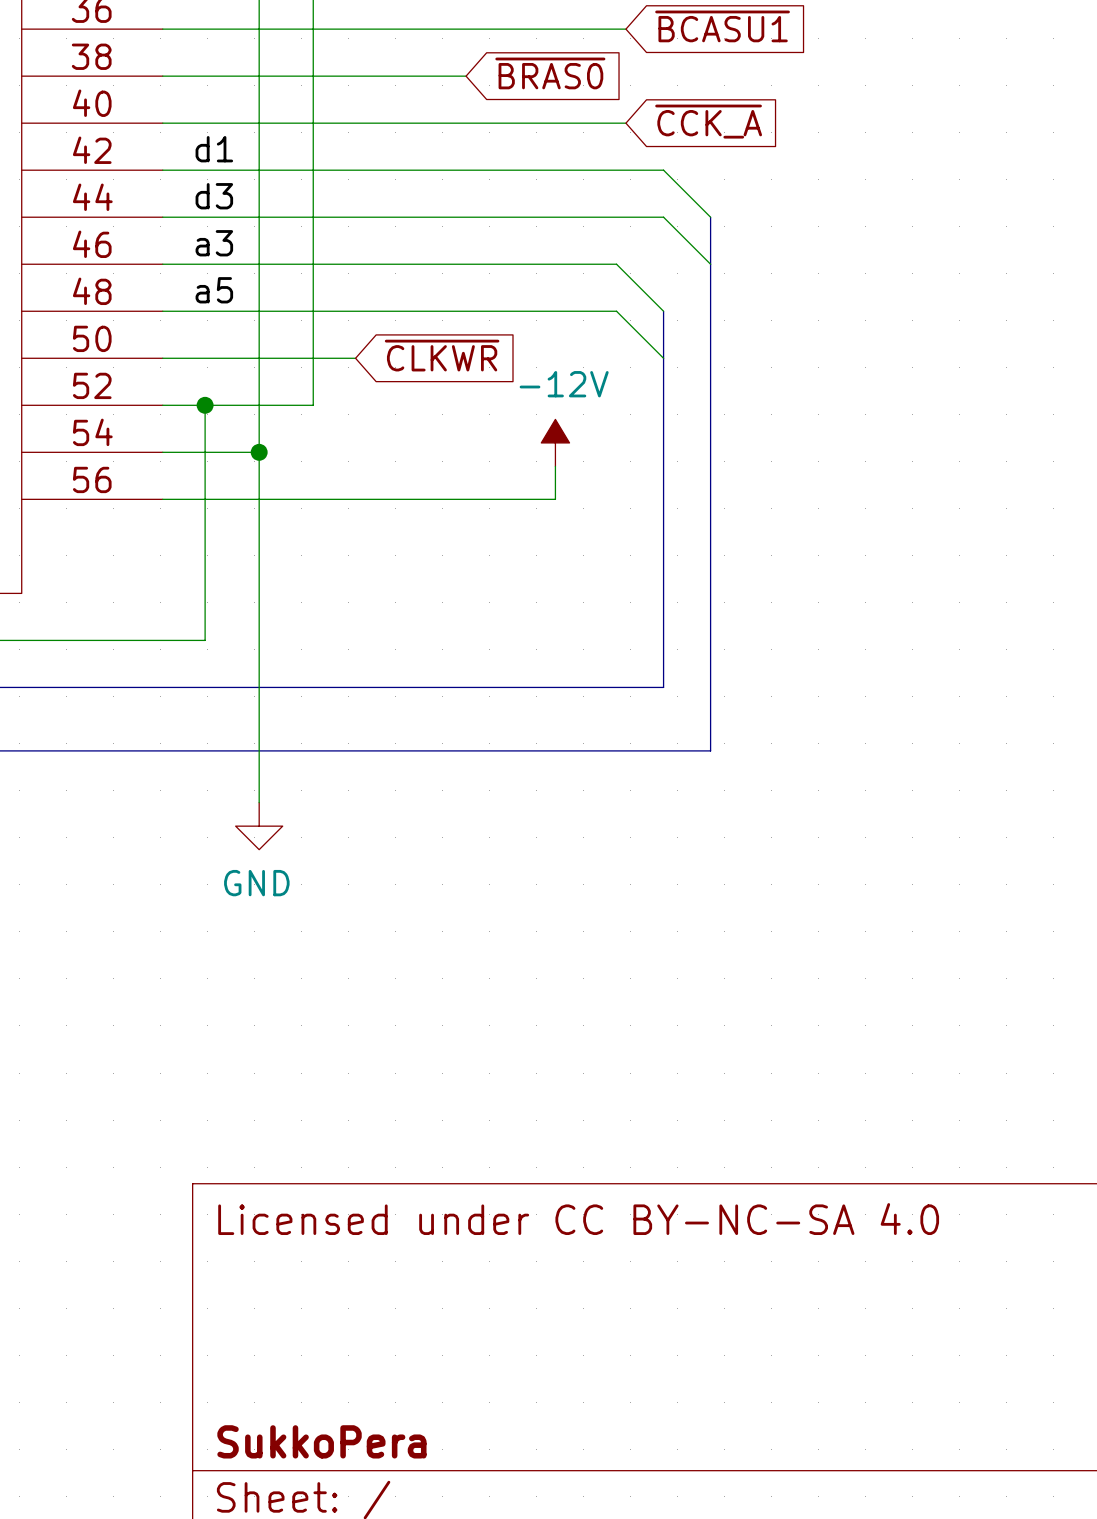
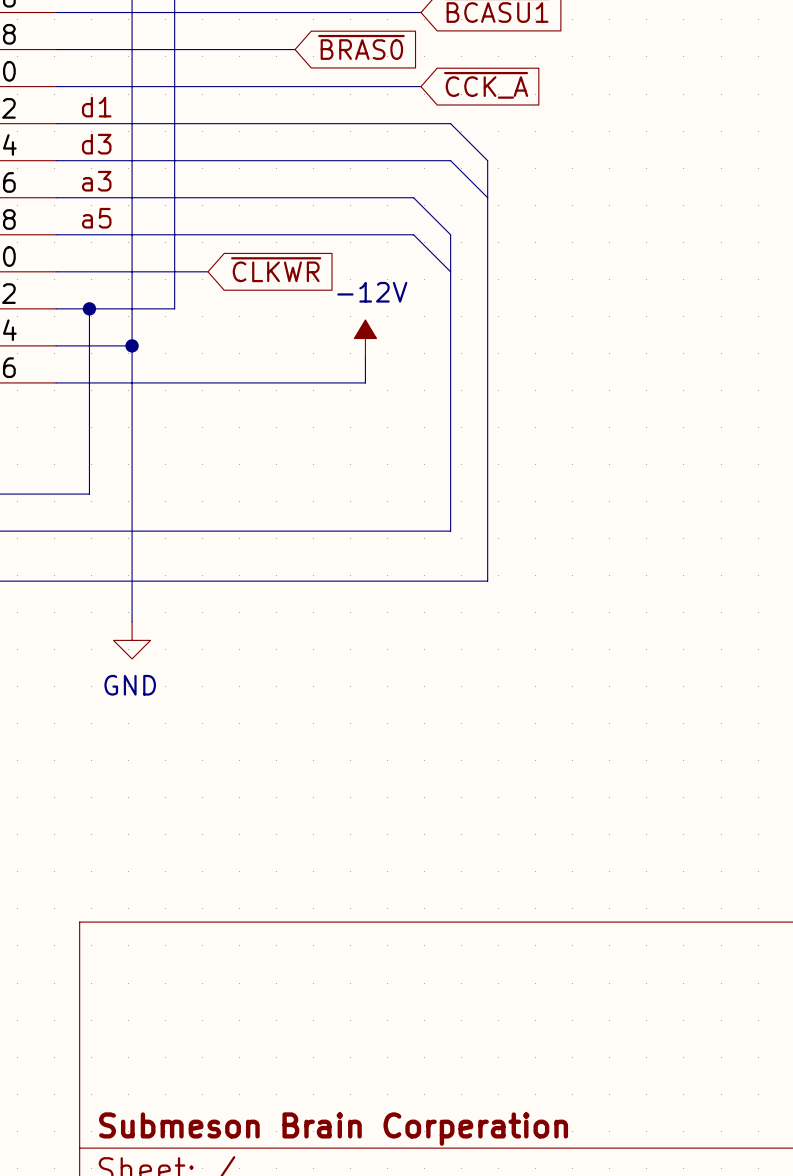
title block: Licensed under CC BY-NC-SA 4.0 (578, 1219) -> none
title block: SukkoPera (321, 1441) -> Submeson Brain Corperation (333, 1129)

